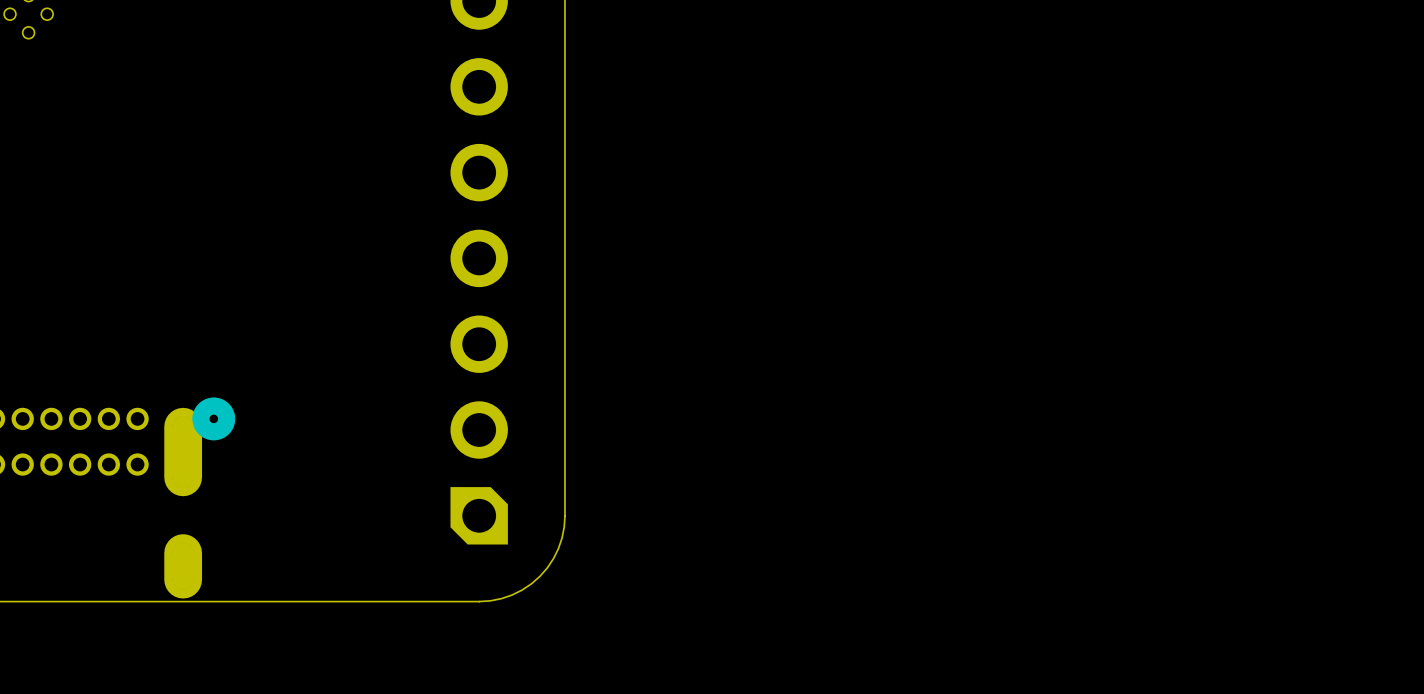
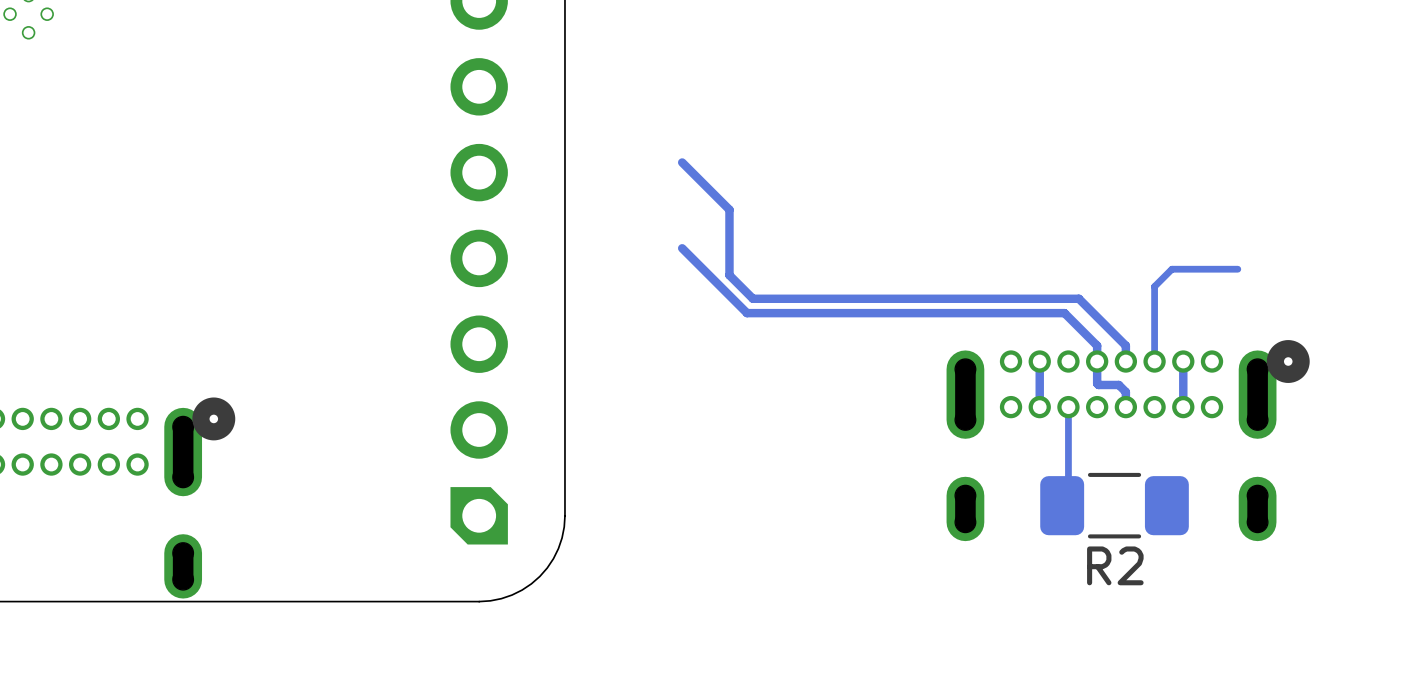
track: none -> (682, 162) (729, 209) (729, 275) (752, 298) (1078, 298) (1125, 345) (1125, 361)
track: none -> (682, 248) (747, 313) (1064, 313) (1097, 345) (1097, 383) (1118, 384) (1125, 392) (1125, 407)
track: none -> (1237, 269) (1171, 269) (1154, 286) (1154, 361)
track: none -> (1039, 361) (1039, 407)
track: none -> (1183, 361) (1183, 407)
track: none -> (1068, 407) (1068, 499) (1062, 505)
part: none -> (1128, 440)
R2: none -> (1114, 505)

